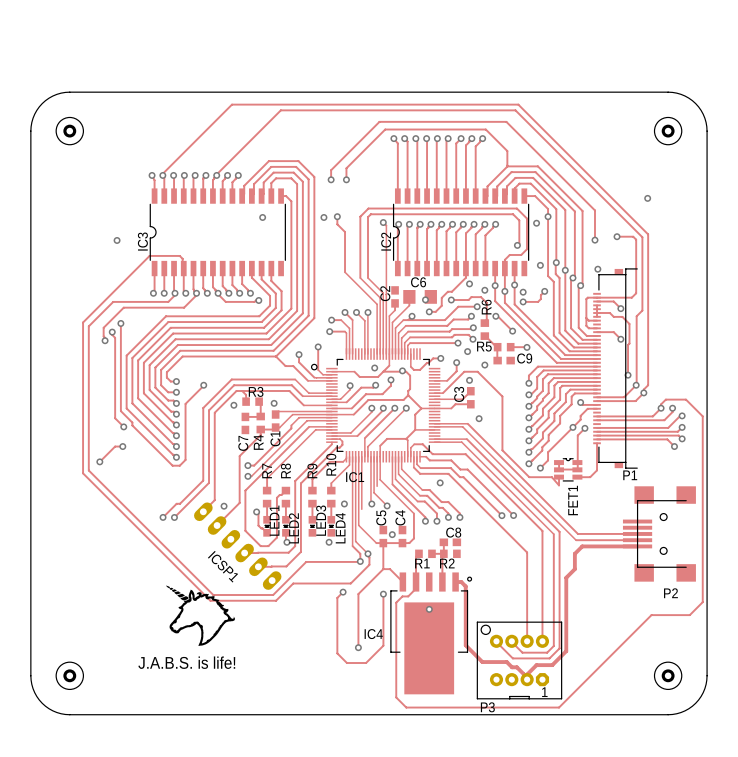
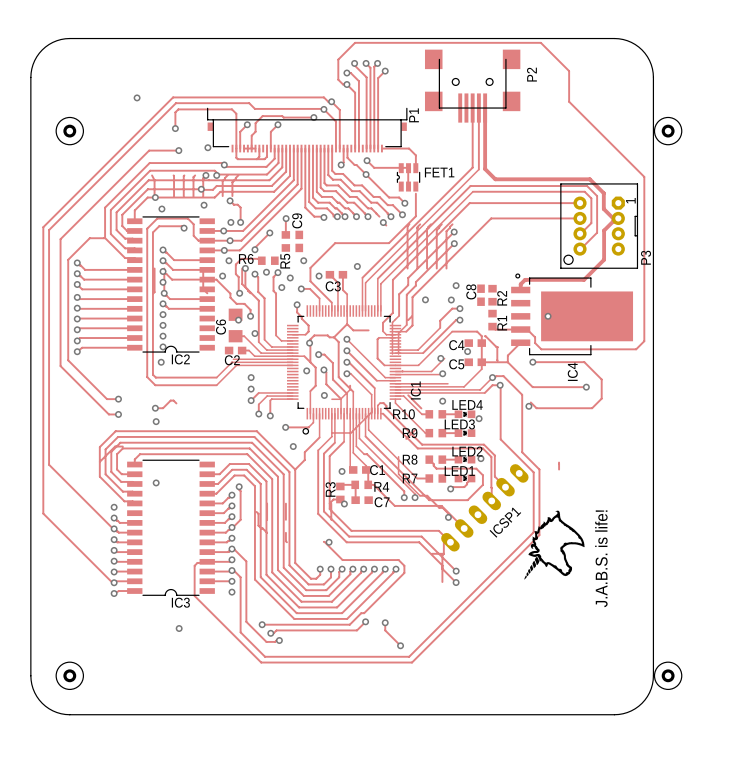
track: none -> (354, 63) (366, 77) (366, 148)
via: none -> (354, 63)
track: none -> (366, 63) (370, 67) (370, 148)
via: none -> (366, 63)
track: none -> (377, 63) (374, 66) (374, 148)
via: none -> (377, 63)
track: none -> (385, 71) (378, 78) (378, 148)
via: none -> (385, 71)
track: none -> (346, 73) (350, 73) (358, 81) (358, 148)
via: none -> (346, 73)
via: none -> (346, 84)
via: none -> (137, 97)
via: none -> (331, 101)
track: none -> (472, 108) (472, 167) (362, 277) (362, 311)
track: none -> (478, 108) (478, 169) (365, 282) (365, 311)
track: none -> (485, 108) (485, 169) (495, 179) (589, 179) (603, 193) (603, 209) (613, 218) (618, 218) (604, 230) (604, 259) (584, 279) (525, 279) (520, 284) (520, 290)
via: none -> (323, 109)
track: none -> (313, 117) (262, 116) (255, 123) (255, 131) (251, 135) (251, 148)
via: none -> (313, 117)
track: none -> (247, 124) (240, 131) (240, 148)
via: none -> (247, 124)
track: none -> (277, 124) (270, 131) (270, 148)
via: none -> (277, 124)
track: none -> (175, 128) (175, 112) (178, 109) (231, 109) (236, 113) (236, 157) (264, 159) (267, 156) (267, 148)
via: none -> (175, 128)
board edge: (30, 131) (34, 114) (42, 103) (52, 96) (69, 92) (668, 92) (685, 96) (695, 103) (703, 114) (707, 131) (706, 680) (698, 700) (680, 712) (668, 714) (614, 714) -> (30, 131) (30, 77) (33, 64) (45, 47) (65, 38) (614, 38) (631, 42) (642, 49) (649, 60) (653, 77) (653, 675) (649, 692) (642, 703) (631, 710) (614, 714)
track: (393, 138) (397, 143) (397, 196) -> none
via: (393, 138) -> none
track: (404, 138) (407, 141) (407, 196) -> none
via: (404, 138) -> none
track: (415, 138) (417, 196) -> none
via: (415, 138) -> none
track: (426, 138) (427, 196) -> none
via: (426, 138) -> none
track: (437, 138) (436, 196) -> none
via: (437, 138) -> none
track: (448, 138) (446, 140) (446, 196) -> none
via: (448, 138) -> none
track: (461, 138) (456, 143) (456, 196) -> none
via: (461, 138) -> none
track: (471, 138) (465, 145) (465, 196) -> none
via: (471, 138) -> none
track: (482, 138) (475, 146) (475, 196) -> none
via: (482, 138) -> none
via: none -> (207, 147)
track: none -> (244, 148) (255, 148)
track: none -> (259, 148) (259, 156) (256, 159)
track: none -> (274, 148) (274, 158) (266, 166) (226, 166) (222, 163) (149, 163) (105, 207) (105, 238)
track: none -> (278, 148) (278, 163) (266, 174) (218, 174) (214, 170) (150, 170) (110, 210) (110, 234) (125, 248) (134, 248) (134, 250)
track: none -> (282, 148) (282, 167) (269, 180) (148, 180) (116, 212) (116, 230) (125, 238) (132, 238) (134, 240)
track: none -> (286, 148) (286, 171) (271, 186) (216, 186) (212, 189) (147, 189) (122, 214) (122, 226) (127, 230) (134, 230)
track: none -> (290, 148) (290, 175) (274, 191) (220, 191) (214, 197) (147, 197) (134, 210) (134, 221)
track: none -> (293, 148) (293, 180) (243, 230) (207, 230)
track: none -> (297, 148) (297, 184) (241, 240) (198, 240) (193, 235) (193, 224) (187, 218) (157, 218) (147, 228) (147, 377) (155, 385) (216, 385) (236, 365) (292, 365)
track: none -> (301, 148) (301, 188) (239, 250) (207, 250)
track: none -> (305, 148) (305, 207) (314, 216) (322, 216)
track: none -> (309, 148) (309, 201) (315, 208) (327, 208) (333, 216)
track: none -> (312, 148) (312, 197) (318, 202) (329, 202) (345, 216)
track: none -> (316, 148) (316, 191) (321, 196) (331, 196) (356, 216)
track: none -> (320, 148) (320, 187) (324, 191) (335, 191) (347, 202) (354, 202) (368, 216)
track: none -> (324, 148) (324, 183) (326, 185) (338, 185) (349, 196) (356, 196) (379, 216)
track: none -> (328, 148) (328, 175) (332, 179) (340, 179) (352, 191) (359, 191) (371, 202) (377, 202) (390, 216)
track: none -> (332, 148) (332, 170) (335, 173) (343, 173) (354, 185) (362, 185) (373, 196) (379, 196) (387, 205) (392, 205) (402, 214)
track: none -> (335, 148) (335, 121) (323, 108) (254, 108) (249, 103) (175, 103) (49, 230) (49, 464) (112, 528) (118, 532) (134, 532)
track: none -> (339, 148) (339, 109) (323, 97) (173, 97) (43, 227) (43, 513) (112, 583) (115, 581) (134, 581)
track: none -> (343, 148) (343, 162) (341, 164)
track: none -> (347, 148) (347, 157) (354, 164) (389, 197) (399, 197) (404, 203)
track: none -> (355, 148) (355, 92) (338, 79) (338, 59) (355, 42) (540, 42) (569, 71) (569, 101) (644, 176) (644, 341) (636, 349) (541, 349) (535, 343) (535, 337) (527, 330) (495, 329) (492, 326)
track: none -> (381, 148) (409, 148) (415, 155) (415, 168)
track: none -> (178, 150) (149, 150) (60, 239) (60, 366) (108, 414) (118, 414)
via: none -> (178, 150)
track: none -> (367, 160) (374, 167) (408, 167) (408, 186)
via: none -> (367, 160)
via: none -> (224, 164)
via: none -> (341, 164)
track: (507, 166) (487, 186) (487, 196) (485, 196) -> none
track: (507, 166) (537, 166) (582, 210) (582, 283) (578, 287) (578, 327) (586, 335) (597, 335) -> none
track: (507, 166) (507, 151) (485, 129) (385, 129) (346, 168) (346, 179) -> none
via: none -> (366, 174)
via: (152, 175) -> none
via: (162, 175) -> none
via: (173, 175) -> none
via: (184, 175) -> none
via: (195, 175) -> none
via: (227, 175) -> none
via: (238, 175) -> none
track: (331, 179) (331, 170) (379, 121) (506, 121) (594, 210) (594, 240) -> none
via: (331, 179) -> none
via: (346, 179) -> none
via: none -> (201, 189)
track: none -> (415, 193) (415, 216) (389, 243) (335, 243) (310, 267) (310, 281) (331, 302) (331, 311)
track: (164, 196) (164, 176) (162, 174) (231, 104) (518, 104) (648, 234) (648, 385) (635, 401) (597, 401) -> none
track: (212, 196) (212, 180) (217, 174) (280, 110) (515, 110) (642, 237) (642, 310) (636, 316) (636, 385) (624, 397) (597, 397) -> none
track: (242, 196) (244, 194) (244, 185) (268, 161) (298, 161) (314, 176) (314, 318) (276, 356) -> none
track: (251, 196) (253, 194) (253, 184) (271, 166) (296, 166) (308, 179) (308, 315) (273, 350) (180, 350) (161, 369) (161, 385) (168, 392) (176, 392) -> none
track: (261, 196) (263, 194) (263, 182) (273, 172) (293, 172) (302, 181) (302, 313) (271, 345) (177, 345) (155, 367) (155, 387) (168, 400) (170, 400) -> (155, 408) (163, 408) (170, 400)
track: (271, 196) (271, 183) (276, 178) (291, 178) (297, 184) (297, 304) -> none
track: (281, 196) (286, 196) (291, 201) (291, 308) (266, 333) (173, 333) (143, 362) (143, 393) (176, 424) -> none
track: (495, 196) (497, 196) (497, 186) (511, 172) (535, 172) (574, 211) (574, 276) (571, 279) (571, 328) (582, 339) (597, 339) -> none
track: (504, 196) (506, 194) (506, 186) (515, 177) (533, 177) (565, 210) (565, 330) (578, 343) (597, 343) -> none
track: (514, 196) (514, 188) (519, 183) (530, 183) (556, 209) (555, 274) (559, 277) (559, 333) (573, 347) (597, 347) -> none
track: (524, 196) (535, 196) (548, 209) (548, 276) (553, 281) (553, 335) (569, 351) (597, 351) -> none
via: none -> (155, 197)
via: (647, 198) -> none
track: none -> (230, 200) (240, 207) (240, 222)
via: none -> (230, 200)
via: none -> (404, 203)
track: none -> (580, 203) (469, 203) (392, 279) (392, 312) (382, 322) (382, 331) (386, 334) (395, 334)
via: none -> (204, 205)
via: none -> (161, 209)
via: none -> (402, 214)
track: (337, 216) (337, 224) (345, 232) (345, 272) (377, 304) (377, 354) -> none
via: none -> (345, 216)
via: none -> (356, 216)
via: none -> (368, 216)
via: none -> (390, 216)
via: (548, 216) -> none
via: (262, 217) -> none
track: none -> (286, 218) (285, 234)
via: none -> (286, 218)
track: none -> (580, 218) (491, 218) (412, 297) (412, 325) (406, 331) (395, 331)
via: none -> (230, 222)
via: none -> (240, 222)
via: (536, 223) -> none
track: (398, 224) (397, 268) -> none
via: (398, 224) -> none
via: (409, 224) -> none
via: (420, 224) -> none
via: (430, 224) -> none
via: (441, 224) -> none
via: (452, 224) -> none
track: (463, 224) (456, 232) (456, 268) -> none
via: (463, 224) -> none
track: (474, 224) (465, 233) (465, 277) (451, 291) (447, 291) (441, 297) (441, 305) (435, 311) (429, 311) -> none
via: (474, 224) -> none
track: (484, 224) (475, 234) (475, 268) -> none
via: (484, 224) -> none
track: (495, 224) (485, 235) (485, 268) -> none
via: (495, 224) -> none
track: (386, 225) (386, 294) -> none
track: none -> (184, 228) (182, 226) (159, 226) (152, 232) (152, 374) (155, 377) (216, 377) (231, 362)
via: none -> (184, 228)
via: none -> (223, 230)
IC3 rotation: 0° (217, 232) -> 90° counterclockwise (171, 527)
IC3 position: (217, 232) -> (171, 527)
track: none -> (269, 232) (254, 249)
via: none -> (269, 232)
via: none -> (454, 232)
IC2 rotation: 0° (461, 232) -> 90° counterclockwise (171, 284)
IC2 position: (461, 232) -> (171, 284)
track: none -> (580, 233) (591, 223) (591, 198) (584, 191) (472, 191) (380, 283) (380, 311)
track: (617, 236) (633, 236) (636, 239) (636, 293) (631, 297) (587, 297) (586, 325) (588, 328) (597, 328) -> none
via: (617, 236) -> none
track: none -> (105, 238) (125, 258) (134, 258) (134, 260)
track: none -> (105, 238) (89, 238) (68, 259) (68, 360) (107, 399) (118, 399)
via: (117, 240) -> none
via: none -> (230, 240)
via: (594, 240) -> none
via: none -> (454, 243)
track: (517, 245) (519, 243) (519, 220) (513, 214) (370, 214) (368, 217) (368, 277) (383, 293) -> none
via: (517, 245) -> none
track: none -> (163, 249) (174, 260) (207, 260)
via: none -> (163, 249)
via: none -> (254, 249)
track: none -> (580, 249) (597, 232) (597, 196) (587, 186) (470, 186) (377, 278) (377, 311)
via: none -> (224, 250)
track: none -> (163, 260) (173, 269) (207, 269)
via: none -> (163, 260)
via: none -> (228, 260)
track: none -> (261, 260) (258, 258) (241, 258) (235, 264) (235, 274) (238, 277) (238, 294)
via: none -> (303, 260)
track: none -> (77, 262) (85, 269) (134, 269)
via: none -> (77, 262)
via: (556, 262) -> none
via: (540, 265) -> none
via: none -> (357, 266)
track: (174, 268) (175, 293) (168, 301) (113, 301) (88, 326) (88, 470) (213, 595) (273, 595) (306, 561) (360, 561) (360, 553) (352, 546) (352, 456) -> none
track: (193, 268) (193, 289) (196, 293) (184, 307) (123, 307) (103, 327) (105, 340) -> none
track: (212, 268) (212, 287) (225, 301) (258, 300) -> none
track: (222, 268) (222, 286) (228, 293) -> none
track: (232, 268) (232, 285) (239, 293) -> none
track: none -> (245, 268) (245, 287) (258, 300) (258, 342) (266, 350) (292, 350)
via: none -> (245, 268)
track: (251, 268) (251, 277) (270, 295) (270, 305) (259, 316) (165, 316) (126, 355) (126, 408) (176, 457) -> none
track: (261, 268) (261, 279) (275, 293) (275, 307) (261, 322) (168, 322) (132, 358) (132, 403) (176, 446) -> none
track: (271, 268) (271, 280) (281, 291) (281, 310) (264, 327) (170, 327) (138, 360) (138, 398) (176, 435) -> none
track: (495, 268) (495, 301) (556, 362) (597, 362) -> none
track: (514, 268) (514, 304) (565, 355) (597, 355) -> none
via: (597, 269) -> none
via: (565, 270) -> none
track: none -> (163, 271) (172, 279) (216, 279) (230, 293) (230, 297) (236, 303) (244, 303) (250, 309) (250, 316)
via: none -> (163, 271)
via: none -> (266, 272)
track: none -> (277, 272) (273, 277) (273, 290) (276, 293) (276, 335) (281, 340) (292, 340)
via: none -> (277, 272)
track: none -> (77, 273) (84, 279) (134, 279)
via: none -> (77, 273)
track: none -> (254, 274) (258, 277) (258, 291) (264, 298) (264, 339) (271, 347) (292, 347)
via: none -> (254, 274)
track: none -> (329, 274) (337, 282) (337, 311)
track: none -> (342, 274) (342, 290) (347, 294) (347, 324)
via: none -> (222, 276)
via: none -> (319, 276)
via: none -> (290, 277)
via: (572, 277) -> none
via: none -> (163, 282)
C6 name position: C6 (418, 282) -> C6 (220, 327)
via: (469, 283) -> none
track: none -> (77, 284) (82, 289) (134, 289)
via: none -> (77, 284)
via: none -> (456, 285)
via: (495, 285) -> none
via: (514, 285) -> none
via: (580, 285) -> none
via: none -> (281, 287)
track: none -> (301, 288) (309, 288) (319, 298) (319, 311)
via: none -> (301, 288)
via: (484, 290) -> none
via: (504, 291) -> none
track: (544, 291) (538, 301) (523, 301) -> none
via: (544, 291) -> none
via: (523, 292) -> none
via: (153, 293) -> none
track: none -> (163, 293) (169, 299) (207, 299)
via: (175, 293) -> none
track: (185, 293) (183, 291) (182, 258) (179, 255) (149, 255) (83, 322) (83, 473) (210, 600) (276, 600) (293, 583) (350, 583) (369, 564) (368, 553) (355, 541) (355, 456) -> none
via: (185, 293) -> none
via: (196, 293) -> none
via: (207, 293) -> none
via: (218, 293) -> none
via: (228, 293) -> none
via: (250, 293) -> none
track: (383, 293) (383, 354) -> none
C2 name position: C2 (385, 293) -> C2 (232, 360)
track: (386, 294) (386, 354) -> none
C2 rotation: 0° (395, 296) -> 90° clockwise (235, 350)
C2 position: (395, 296) -> (235, 350)
track: (409, 296) (409, 305) (399, 315) -> (454, 232) (408, 277) (408, 285) (399, 294) (399, 315)
C6 rotation: 0° (420, 296) -> 90° clockwise (235, 325)
C6 position: (420, 296) -> (235, 325)
track: none -> (77, 297) (78, 299) (134, 299)
via: none -> (77, 297)
via: (258, 300) -> none
track: (451, 300) (468, 300) (471, 297) (481, 297) (486, 302) (486, 319) (484, 323) -> none
via: (523, 301) -> none
track: (597, 301) (613, 301) (620, 308) -> none
track: none -> (163, 303) (168, 308) (207, 308)
via: none -> (163, 303)
track: (395, 303) (395, 310) (389, 315) (389, 365) (378, 376) (359, 376) (354, 371) (331, 371) -> none
via: none -> (297, 304)
track: (597, 305) (597, 316) -> none
track: (477, 306) (458, 306) (444, 320) (403, 320) (395, 328) (395, 354) -> none
via: (477, 306) -> none
R6 name position: R6 (486, 307) -> R6 (246, 258)
track: none -> (77, 308) (134, 308)
via: none -> (77, 308)
track: none -> (459, 308) (452, 308) (440, 320) (440, 327) (418, 350) (395, 350)
via: none -> (459, 308)
via: (620, 308) -> none
track: (297, 311) (268, 339) (175, 339) (149, 365) (149, 390) (171, 411) (176, 414) -> (297, 311) (308, 325) (308, 331) (305, 334) (292, 334)
via: (429, 311) -> none
track: (345, 312) (352, 320) (352, 354) -> none
via: (345, 312) -> none
track: (356, 312) (364, 320) (364, 354) -> none
via: (356, 312) -> none
track: (367, 312) (367, 354) -> none
via: (368, 312) -> none
track: (597, 312) (609, 312) (613, 316) (622, 316) (629, 323) (628, 375) -> none
via: none -> (163, 314)
via: none -> (250, 316)
via: (412, 316) -> none
track: (471, 316) (468, 319) (453, 319) (447, 325) (405, 325) -> (454, 243) (415, 282) (415, 285) (406, 294) (405, 325)
via: (471, 316) -> none
track: (495, 316) (512, 331) -> none
via: (495, 316) -> none
via: none -> (548, 316)
via: none -> (77, 318)
track: none -> (134, 318) (77, 318)
track: (586, 318) (588, 320) (597, 320) -> none
via: none -> (238, 320)
track: (331, 320) (341, 320) (349, 328) (349, 354) -> none
via: (331, 320) -> none
track: none -> (459, 320) (456, 320) (423, 353) (395, 353)
via: none -> (459, 320)
track: (120, 323) (120, 411) (132, 422) (132, 425) (172, 465) (179, 465) (185, 459) (185, 403) (203, 385) -> none
via: (120, 323) -> none
track: none -> (347, 324) (353, 330) (368, 330)
track: none -> (347, 324) (334, 337)
via: none -> (163, 325)
track: (473, 327) (452, 329) (449, 331) (408, 331) (401, 338) (401, 354) -> none
via: (473, 327) -> none
track: none -> (134, 328) (77, 329)
via: none -> (77, 329)
R6 rotation: 0° (484, 329) -> 90° clockwise (268, 260)
R6 position: (484, 329) -> (268, 260)
track: (329, 331) (346, 333) (346, 354) -> none
via: (329, 331) -> none
via: (512, 331) -> none
track: (112, 332) (115, 337) (115, 418) (123, 426) -> none
via: (112, 332) -> none
track: (597, 332) (613, 332) (620, 339) -> none
via: none -> (254, 333)
via: none -> (163, 336)
track: none -> (235, 336) (244, 336) (261, 353) (292, 353)
track: none -> (334, 337) (314, 335) (310, 339) (310, 362)
track: none -> (334, 337) (338, 342) (338, 377) (353, 391) (353, 452) (366, 465) (368, 484) (373, 484) (394, 505) (441, 505) (464, 528)
track: none -> (395, 337) (377, 339) (377, 358) (384, 365) (418, 365) (452, 331) (477, 331) (481, 336) (481, 369) (464, 386) (395, 386)
track: none -> (134, 338) (80, 338) (77, 340)
track: none -> (346, 339) (385, 377) (395, 377)
via: none -> (346, 339)
track: (472, 339) (468, 334) (454, 334) (452, 337) (410, 337) (404, 342) (404, 354) -> none
via: (472, 339) -> none
via: (620, 339) -> none
via: none -> (77, 340)
via: (105, 340) -> none
track: none -> (520, 342) (507, 355) (507, 362)
via: none -> (309, 343)
track: (458, 343) (410, 343) (407, 345) (407, 354) -> none
via: (458, 343) -> none
via: none -> (163, 346)
track: (318, 346) (318, 369) (323, 374) (331, 374) -> none
via: (318, 346) -> none
R5 name position: R5 (484, 346) -> R5 (285, 261)
track: none -> (134, 347) (82, 347) (77, 351)
R5 rotation: 0° (504, 347) -> 90° clockwise (285, 241)
R5 position: (504, 347) -> (285, 241)
track: (510, 347) (526, 347) -> none
via: (526, 347) -> none
track: none -> (242, 350) (249, 350) (254, 356) (304, 356) (315, 367) (315, 385) (310, 391) (310, 413)
track: none -> (346, 350) (376, 380) (395, 380)
via: none -> (346, 350)
via: none -> (77, 351)
track: (299, 354) (299, 362) (314, 377) (331, 377) -> none
via: (299, 354) -> none
track: none -> (318, 354) (324, 354) (332, 363) (332, 379) (347, 393) (347, 413)
via: none -> (318, 354)
track: (380, 354) (380, 297) (360, 277) (360, 216) (368, 208) (516, 208) (526, 218) (526, 249) (521, 254) (509, 254) (504, 259) (504, 302) (561, 358) (597, 358) -> none
track: (410, 354) (410, 366) (413, 369) (420, 369) (433, 358) (440, 358) -> none
track: (276, 356) (182, 356) (166, 372) (166, 377) (170, 381) (176, 381) -> none
track: (276, 356) (285, 366) (293, 366) (308, 380) (331, 380) -> none
track: none -> (444, 358) (431, 371) (395, 371)
C9 name position: C9 (524, 358) -> C9 (297, 220)
track: none -> (233, 359) (292, 359)
C9 rotation: 0° (504, 360) -> 90° clockwise (299, 241)
C9 position: (504, 360) -> (299, 241)
via: none -> (161, 362)
track: none -> (232, 362) (292, 362)
track: none -> (346, 362) (374, 388) (374, 413)
via: none -> (346, 362)
track: (456, 362) (456, 371) (447, 380) (434, 380) -> none
via: (456, 362) -> none
track: none -> (481, 362) (507, 362)
track: none -> (507, 362) (532, 387) (586, 387)
track: none -> (532, 362) (584, 362) (601, 379) (601, 398) (592, 408) (536, 408) (530, 402)
via: none -> (532, 362)
via: (484, 365) -> none
track: (597, 366) (537, 366) (528, 375) (528, 383) -> none
via: (374, 368) -> none
P1 rotation: 0° (615, 368) -> 90° counterclockwise (307, 130)
P1 position: (615, 368) -> (307, 130)
track: none -> (323, 369) (326, 372) (326, 384) (341, 398) (341, 413)
via: none -> (323, 369)
via: none -> (306, 370)
via: (402, 370) -> none
track: (597, 370) (543, 370) (537, 376) (537, 388) (528, 394) -> none
track: (383, 371) (406, 371) (410, 375) (410, 389) (408, 395) (403, 399) (368, 399) (353, 414) (292, 414) (279, 427) (260, 429) (260, 435) (239, 456) (239, 502) (217, 525) -> none
track: none -> (346, 373) (350, 373) (371, 394) (371, 413)
via: none -> (346, 373)
track: none -> (442, 373) (395, 374)
via: none -> (442, 373)
track: (597, 374) (547, 374) (542, 379) (542, 390) (528, 406) -> none
via: (628, 375) -> none
via: none -> (251, 377)
via: none -> (492, 377)
track: (597, 378) (553, 378) (548, 383) (548, 393) (528, 417) -> none
track: (390, 379) (390, 385) (382, 394) (366, 394) (351, 408) (331, 408) -> none
via: (390, 379) -> none
via: (469, 380) -> none
via: (176, 381) -> none
track: (597, 381) (558, 381) (554, 385) (554, 397) (542, 408) (542, 415) (528, 429) -> none
track: none -> (395, 383) (447, 383)
via: (528, 383) -> none
via: (203, 385) -> none
via: (350, 385) -> none
track: (375, 385) (373, 387) (361, 387) (346, 402) (331, 402) -> none
via: (375, 385) -> none
via: none -> (500, 385)
track: (597, 385) (562, 385) (560, 388) (560, 399) (548, 411) (548, 417) (528, 440) -> none
via: (636, 385) -> none
via: none -> (251, 389)
track: none -> (395, 389) (480, 389) (492, 377) (503, 376) (522, 394) (522, 452) (539, 469) (539, 535) (412, 662) (261, 662) (194, 595) (194, 565) (197, 562) (229, 561) (231, 559)
track: (597, 389) (570, 389) (565, 394) (565, 402) (554, 413) (554, 421) (542, 432) (542, 438) (528, 452) -> none
track: (242, 390) (246, 394) (246, 401) -> none
R3 name position: R3 (256, 391) -> R3 (330, 489)
track: (470, 391) (462, 399) (434, 399) -> none
via: (176, 392) -> none
track: none -> (292, 392) (258, 392) (251, 400)
track: none -> (395, 392) (484, 392) (492, 385) (500, 385) (500, 439) (533, 472) (533, 532) (409, 656) (265, 656) (240, 632) (240, 577) (231, 570) (207, 571)
via: (643, 392) -> none
track: (331, 393) (308, 393) (295, 379) (231, 379) (203, 408) (203, 480) (163, 517) -> none
track: (434, 393) (442, 393) (464, 371) (477, 371) (502, 396) (502, 450) (529, 477) (551, 477) (559, 485) (559, 477) -> none
track: (597, 393) (574, 393) (571, 396) (571, 404) (560, 415) (560, 423) (548, 434) (548, 440) (542, 447) (542, 450) (528, 463) -> none
C3 name position: C3 (459, 394) -> C3 (333, 286)
via: (528, 394) -> none
via: none -> (324, 395)
track: none -> (292, 396) (267, 396) (258, 404) (258, 413)
track: (331, 396) (302, 396) (291, 385) (234, 385) (209, 410) (209, 482) (174, 517) -> none
track: none -> (395, 396) (403, 396) (421, 414) (429, 414)
C3 rotation: 0° (470, 397) -> 90° clockwise (336, 274)
C3 position: (470, 397) -> (336, 274)
via: none -> (118, 399)
track: none -> (292, 399) (271, 399) (270, 415)
track: none -> (395, 399) (395, 403) (425, 433) (429, 433)
via: none -> (251, 400)
R3 rotation: 0° (252, 401) -> 90° clockwise (340, 492)
R3 position: (252, 401) -> (340, 492)
track: (259, 401) (260, 416) (245, 416) -> none
via: none -> (442, 401)
track: (580, 402) (583, 404) (597, 404) -> none
via position: (580, 402) -> (586, 387)
via: (176, 403) -> none
via: (274, 403) -> none
track: (470, 404) (455, 404) (451, 408) (421, 408) (415, 414) (415, 429) (434, 429) -> none
via: (233, 405) -> none
track: (331, 405) (303, 405) (289, 390) (236, 390) (214, 412) (214, 500) (203, 511) -> none
IC1 rotation: 0° (375, 405) -> 90° counterclockwise (344, 369)
via: none -> (155, 408)
via: (371, 408) -> none
track: (383, 408) (357, 436) (331, 436) -> none
via: (383, 408) -> none
track: (394, 408) (364, 438) (364, 456) -> none
via: (394, 408) -> none
track: (406, 408) (367, 446) (367, 456) -> none
via: (406, 408) -> none
track: (597, 408) (587, 408) (580, 415) (580, 419) (548, 452) (548, 460) (540, 468) -> none
via: (661, 408) -> none
track: (672, 408) (672, 412) (664, 420) (597, 420) -> none
via: (672, 408) -> none
track: (331, 411) (278, 411) (275, 414) -> none
via: none -> (258, 413)
track: none -> (319, 413) (319, 437) (304, 452) (304, 460) (295, 469)
track: none -> (331, 413) (331, 436) (318, 450) (318, 513) (346, 542) (419, 542) (456, 582)
track: none -> (334, 413) (334, 442) (323, 453) (323, 511) (349, 536) (421, 536) (456, 571)
track: none -> (344, 413) (344, 441) (329, 456) (329, 509) (351, 530) (438, 530) (450, 542)
track: none -> (350, 413) (350, 466) (353, 469)
track: none -> (356, 413) (356, 446) (364, 454) (367, 454) (404, 491) (404, 497)
track: none -> (359, 413) (359, 438) (415, 494) (415, 497)
track: none -> (365, 413) (365, 436) (429, 500) (467, 500) (482, 484) (482, 475) (476, 468) (436, 468) (429, 459)
track: none -> (368, 413) (368, 429) (417, 478) (429, 478)
track: none -> (377, 413) (377, 405) (383, 403) (386, 408) (422, 444) (483, 444) (494, 455) (494, 476) (505, 487)
track: none -> (380, 413) (417, 448) (482, 448) (491, 456) (491, 500)
via: (176, 414) -> none
track: none -> (442, 414) (458, 414)
via: none -> (270, 415)
track: (682, 415) (668, 427) (597, 427) -> none
via: (682, 415) -> none
track: (597, 416) (652, 416) (665, 399) (685, 399) (702, 416) (702, 602) (689, 615) (651, 615) (559, 707) (406, 707) (396, 697) (396, 602) (402, 596) (408, 596) (415, 589) (416, 556) (418, 553) -> none
track: (331, 417) (299, 417) (291, 425) (291, 428) (254, 465) (247, 465) -> none
via: (528, 417) -> none
track: (331, 420) (307, 420) (251, 476) (247, 476) -> none
via: none -> (156, 421)
C1 rotation: 0° (275, 421) -> 90° clockwise (359, 469)
C1 position: (275, 421) -> (359, 469)
C7 rotation: 0° (245, 423) -> 90° clockwise (362, 500)
C7 position: (245, 423) -> (362, 500)
R4 rotation: 0° (260, 423) -> 90° clockwise (361, 484)
R4 position: (260, 423) -> (361, 484)
track: (434, 423) (467, 423) (577, 533) (637, 533) -> none
via: (176, 424) -> none
via position: (123, 426) -> (118, 414)
track: (309, 426) (331, 426) -> (309, 426) (313, 422) (313, 413)
track: (434, 426) (462, 426) (576, 540) (637, 540) -> none
via: none -> (285, 427)
track: (308, 427) (245, 490) (245, 530) (260, 546) (268, 546) (276, 537) (276, 497) (285, 490) -> (308, 427) (285, 427)
via: (572, 427) -> none
track: (682, 427) (677, 431) (597, 431) -> none
via: (682, 427) -> none
track: (584, 428) (577, 435) (577, 469) (559, 469) -> none
via: (584, 428) -> none
track: (331, 429) (315, 429) (267, 478) (267, 490) -> none
via: (528, 429) -> none
track: none -> (442, 433) (458, 433)
via: (176, 435) -> none
track: (597, 435) (678, 435) (682, 438) -> none
C1 name position: C1 (275, 438) -> C1 (377, 470)
via: (682, 438) -> none
track: (331, 439) (340, 439) (342, 444) (336, 447) (300, 483) (300, 551) (286, 566) (258, 566) -> none
track: (434, 439) (466, 439) (559, 531) (559, 648) (549, 658) (512, 658) (496, 641) -> none
track: (597, 439) (667, 439) (674, 446) -> none
via: (528, 440) -> none
R4 name position: R4 (258, 442) -> R4 (381, 486)
track: (331, 442) (295, 481) -> (295, 469) (295, 481)
track: (434, 442) (461, 442) (553, 534) (553, 646) (547, 652) (522, 652) (511, 641) -> none
C7 name position: C7 (243, 443) -> C7 (382, 502)
track: (597, 443) (597, 470) (590, 477) (577, 477) -> none
via: (122, 446) -> none
via: (176, 446) -> none
via: none -> (293, 446)
via: (674, 446) -> none
via: (528, 452) -> none
track: (346, 456) (343, 461) (329, 461) (312, 479) (312, 490) -> none
track: (349, 456) (349, 465) (331, 483) (331, 490) -> none
track: (358, 456) (358, 525) (376, 543) (409, 543) (413, 538) (413, 513) (380, 479) (380, 445) (387, 438) (406, 438) (407, 456) -> none
track: (361, 456) (361, 509) -> none
track: (370, 456) (371, 504) -> none
track: (374, 456) (374, 492) (387, 505) -> none
track: (377, 456) (377, 486) -> none
track: (392, 456) (392, 484) (425, 517) (425, 521) -> none
track: (395, 456) (395, 479) (417, 501) (424, 501) (436, 513) (436, 521) -> none
track: (401, 456) (401, 469) (422, 490) (429, 490) (441, 502) (448, 502) (459, 513) (459, 517) -> none
track: (410, 456) (410, 447) (414, 444) (422, 444) (432, 454) (465, 454) (542, 530) (542, 641) -> none
track: (413, 456) (413, 467) (420, 473) (448, 473) (527, 552) (527, 641) -> none
track: (416, 456) (416, 464) (420, 468) (450, 468) (459, 477) (463, 477) (501, 515) -> none
track: (420, 456) (426, 456) (429, 460) (451, 460) (460, 469) (467, 469) (513, 515) -> none
via: (176, 457) -> none
via: none -> (480, 458)
track: none -> (442, 459) (458, 459)
via: (99, 461) -> none
via: (528, 463) -> none
track: none -> (134, 464) (134, 459) (140, 454) (247, 454) (272, 479) (272, 572) (301, 601) (332, 601) (363, 569)
R10 name position: R10 (331, 464) -> R10 (403, 414)
via: (247, 465) -> none
via: (540, 468) -> none
track: none -> (295, 469) (256, 431) (115, 431) (99, 447) (99, 476) (124, 501) (132, 501) (134, 503)
FET1 rotation: 0° (568, 469) -> 90° counterclockwise (408, 177)
FET1 position: (568, 469) -> (408, 177)
R7 name position: R7 (267, 470) -> R7 (410, 478)
R8 name position: R8 (285, 470) -> R8 (410, 459)
R9 name position: R9 (312, 470) -> R9 (410, 433)
via: none -> (342, 471)
track: none -> (134, 474) (121, 474) (117, 469) (117, 454) (122, 448) (249, 448) (277, 476) (277, 570) (303, 595) (328, 595) (350, 574) (352, 569)
track: none -> (207, 474) (219, 474) (229, 464) (249, 464) (266, 481) (266, 574) (299, 607) (337, 607) (374, 569)
via: (247, 476) -> none
track: none -> (471, 478) (464, 487) (452, 487) (450, 488)
via: none -> (156, 482)
via position: (440, 482) -> (450, 488)
track: none -> (134, 483) (132, 481) (121, 481) (111, 471) (111, 451) (120, 442) (252, 442) (283, 474) (283, 567) (306, 590) (326, 590) (339, 577) (339, 572) (342, 569)
track: none -> (207, 483) (218, 483) (232, 469) (246, 469) (260, 483) (260, 577) (296, 613) (342, 613) (385, 569)
track: none -> (239, 486) (240, 519) (225, 532) (207, 532)
via: none -> (239, 486)
track: none -> (340, 486) (355, 484) (355, 500)
track: none -> (134, 493) (132, 491) (122, 491) (105, 474) (105, 449) (118, 436) (254, 436) (289, 471) (289, 565) (308, 584) (323, 584) (331, 577) (331, 569)
track: none -> (207, 493) (216, 493) (234, 475) (244, 475) (254, 486) (254, 579) (294, 618) (347, 618) (396, 569)
track: none -> (231, 495) (222, 503) (207, 503)
via: none -> (231, 495)
R7 rotation: 0° (267, 497) -> 90° clockwise (435, 478)
R7 position: (267, 497) -> (435, 478)
R8 rotation: 0° (285, 497) -> 90° clockwise (435, 459)
R8 position: (285, 497) -> (435, 459)
R9 rotation: 0° (312, 497) -> 90° clockwise (435, 433)
R9 position: (312, 497) -> (435, 433)
R10 rotation: 0° (331, 497) -> 90° clockwise (435, 414)
R10 position: (331, 497) -> (435, 414)
via: none -> (404, 497)
via: none -> (415, 497)
track: none -> (340, 499) (333, 499) (329, 503)
track: (312, 503) (312, 519) -> none
via: (371, 504) -> none
track: none -> (231, 505) (223, 513) (207, 513)
via: none -> (231, 505)
via: (387, 505) -> none
via: (224, 506) -> none
via: none -> (114, 507)
drawing: none -> [524, 510, 585, 580]
via: (256, 511) -> none
via: (501, 515) -> none
via: (513, 515) -> none
track: none -> (231, 516) (224, 522) (207, 522)
via: none -> (231, 516)
via: (163, 517) -> none
via: (174, 517) -> none
C5 name position: C5 (381, 517) -> C5 (456, 364)
C4 name position: C4 (400, 517) -> C4 (456, 345)
via: (459, 517) -> none
track: none -> (114, 518) (119, 522) (134, 522)
via: none -> (114, 518)
via: (425, 521) -> none
via: (436, 521) -> none
LED1 rotation: 0° (267, 526) -> 90° counterclockwise (465, 478)
LED1 position: (267, 526) -> (465, 478)
LED2 rotation: 0° (285, 526) -> 90° counterclockwise (465, 459)
LED2 position: (285, 526) -> (465, 459)
LED3 rotation: 0° (312, 526) -> 90° counterclockwise (465, 433)
LED3 position: (312, 526) -> (465, 433)
LED4 rotation: 0° (331, 526) -> 90° counterclockwise (465, 414)
LED4 position: (331, 526) -> (465, 414)
via: none -> (231, 527)
via: none -> (114, 528)
C8 name position: C8 (453, 532) -> C8 (471, 291)
P2 rotation: 0° (659, 533) -> 90° counterclockwise (472, 86)
P2 position: (659, 533) -> (472, 86)
via: (392, 534) -> none
C5 rotation: 0° (383, 536) -> 90° clockwise (475, 362)
C5 position: (383, 536) -> (475, 362)
C4 rotation: 0° (402, 536) -> 90° clockwise (475, 343)
C4 position: (402, 536) -> (475, 343)
track: none -> (231, 538) (226, 542) (207, 542)
via: none -> (231, 538)
track: none -> (114, 539) (117, 542) (134, 542)
via: none -> (114, 539)
track: none -> (323, 541) (342, 560) (398, 560) (404, 565) (404, 572) (364, 613) (361, 613) (349, 624) (262, 624)
via: (286, 542) -> none
C8 rotation: 0° (450, 542) -> 90° clockwise (481, 295)
C8 position: (450, 542) -> (481, 295)
track: (383, 543) (383, 569) -> none
ICSP1 rotation: 0° (237, 546) -> 90° clockwise (484, 507)
ICSP1 position: (237, 546) -> (484, 507)
track: (295, 546) (288, 552) (244, 553) -> (295, 546) (295, 562) (311, 578) (316, 578) (320, 574) (320, 569)
track: (637, 546) (582, 546) (574, 553) (574, 569) (566, 577) (566, 651) (552, 665) (536, 665) (527, 674) (527, 679) (516, 667) (512, 667) (506, 662) (482, 662) (465, 645) (465, 586) (461, 582) (455, 582) -> none
via: none -> (231, 549)
track: none -> (114, 550) (115, 552) (134, 552)
via: none -> (114, 550)
track: none -> (207, 552) (228, 552) (231, 549) (246, 561) (246, 621) (266, 641) (279, 640)
via: (368, 553) -> none
R1 rotation: 0° (425, 553) -> 90° clockwise (492, 320)
R1 position: (425, 553) -> (492, 320)
R2 rotation: 0° (450, 553) -> 90° clockwise (492, 295)
R2 position: (450, 553) -> (492, 295)
via: none -> (231, 559)
track: none -> (114, 561) (134, 561)
via: none -> (114, 561)
via: (360, 561) -> none
R1 name position: R1 (422, 563) -> R1 (502, 323)
R2 name position: R2 (447, 563) -> R2 (502, 298)
ICSP1 name position: ICSP1 (222, 566) -> ICSP1 (505, 522)
via: none -> (320, 569)
via: none -> (331, 569)
via: none -> (342, 569)
via: none -> (352, 569)
via: none -> (363, 569)
via: none -> (374, 569)
track: (383, 569) (358, 594) (358, 647) -> none
track: (383, 569) (389, 569) (402, 582) -> none
via: none -> (385, 569)
via: none -> (396, 569)
via: none -> (231, 570)
via: none -> (114, 571)
track: none -> (134, 571) (114, 571)
via: none -> (456, 571)
track: none -> (207, 581) (231, 581)
via: none -> (231, 581)
via: none -> (114, 582)
via: none -> (456, 582)
drawing: [166, 585, 235, 646] -> none
track: none -> (134, 591) (119, 591) (114, 593)
via: none -> (231, 592)
track: (343, 592) (337, 597) (337, 653) (346, 663) (366, 663) (383, 645) (383, 594) -> none
via: (343, 592) -> none
via: none -> (114, 593)
via: (383, 594) -> none
via: (429, 609) -> none
track: none -> (365, 621) (356, 630) (276, 630) (270, 633)
via: none -> (365, 621)
track: none -> (385, 622) (385, 630) (400, 645)
via: none -> (385, 622)
via: none -> (262, 624)
via: none -> (179, 628)
via: none -> (270, 633)
IC4 rotation: 0° (431, 633) -> 90° counterclockwise (572, 314)
IC4 position: (431, 633) -> (572, 314)
via: none -> (279, 640)
via: none -> (400, 645)
via: (358, 647) -> none
P3 rotation: 0° (519, 660) -> 90° counterclockwise (599, 226)
P3 position: (519, 660) -> (599, 226)

